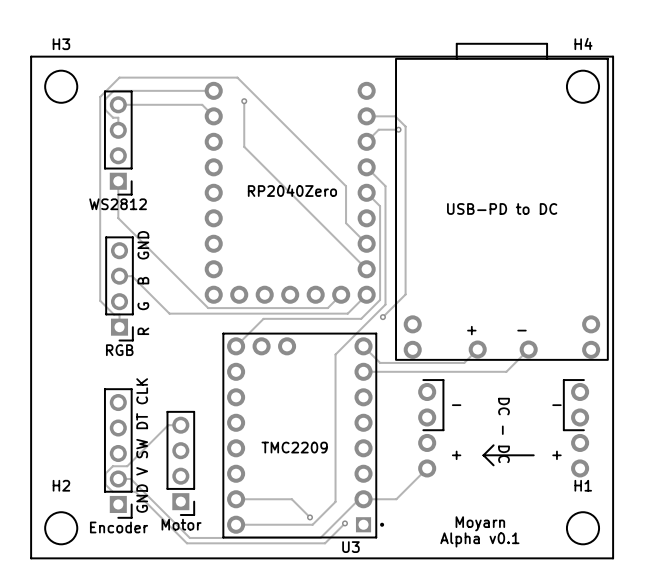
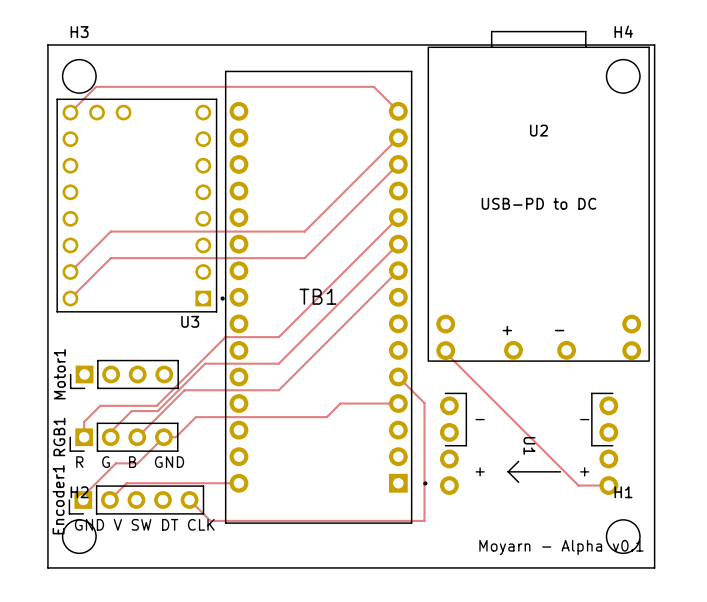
track: (213, 90) (113, 90) (105, 99) (105, 109) (113, 117) (118, 117) (118, 130) -> none
track: (244, 101) (244, 146) (366, 269) -> none
via: (244, 101) -> none
track: (118, 104) (202, 104) (213, 116) -> none
track: (366, 116) (395, 116) (405, 126) (405, 294) (382, 317) -> none
track: none -> (398, 111) (373, 86) (96, 86) (70, 112)
track: (398, 129) (378, 129) (366, 141) -> none
via: (398, 129) -> none
U2 name: none -> U2 (538, 130)
WS2812: (118, 143) -> none
track: none -> (398, 137) (304, 231) (110, 231) (70, 271)
track: (366, 167) (385, 186) (385, 304) (335, 354) (335, 501) (312, 524) (236, 524) -> none
track: none -> (398, 164) (304, 258) (110, 258) (70, 298)
track: (118, 181) (118, 218) (208, 308) (327, 308) (341, 294) -> none
text: RP2040Zero (292, 190) -> none
part: (290, 192) -> none
track: (366, 192) (380, 206) (380, 299) (361, 318) (263, 318) (236, 346) -> none
track: none -> (398, 217) (278, 337) (225, 337) (156, 405) (100, 405) (84, 421) (84, 437)
track: (366, 243) (346, 223) (346, 186) (237, 77) (119, 77) (100, 96) (100, 300) (114, 314) (119, 314) (119, 327) -> none
track: none -> (398, 244) (278, 363) (205, 363) (157, 411) (131, 411) (110, 432) (110, 437)
track: none -> (398, 270) (278, 390) (184, 390) (137, 437)
track: (119, 276) (132, 276) (169, 313) (347, 313) (366, 294) -> none
RGB: (119, 288) -> none
TB1: none -> (326, 297)
via: (382, 317) -> none
U3 footprint: [222, 332, 385, 539] -> [56, 98, 225, 313]
track: (363, 346) (380, 362) (464, 362) (477, 349) -> none
track: none -> (441, 348) (578, 485) (608, 485)
track: (528, 349) (506, 371) (363, 371) -> none
Motor1: none -> (124, 374)
track: none -> (398, 376) (424, 403) (424, 520) (210, 520) (189, 499)
track: none -> (398, 403) (340, 403) (326, 417) (196, 417) (175, 437) (163, 437) (137, 463) (115, 463) (83, 496) (83, 499)
track: (180, 425) (168, 425) (127, 466) (112, 466) (105, 473) (105, 484) (112, 491) (135, 491) (186, 543) (325, 543) (344, 523) -> none
DC - DC: (503, 428) -> none
RGB1: none -> (124, 437)
U1: none -> (529, 443)
text: TMC2209 (294, 447) -> none
Encoder: (118, 453) -> none
Motor: (180, 463) -> none
track: (427, 468) (396, 499) (359, 499) (320, 537) (189, 537) (130, 478) (118, 478) -> none
track: none -> (238, 483) (126, 483) (109, 499)
Encoder1: none -> (136, 499)
track: (236, 499) (291, 499) (310, 517) -> none
via: (310, 517) -> none
via: (344, 523) -> none
text: Moyarn (480, 523) -> none
text: Alpha v0.1 (479, 539) -> Moyarn - Alpha v0.1 (561, 547)

